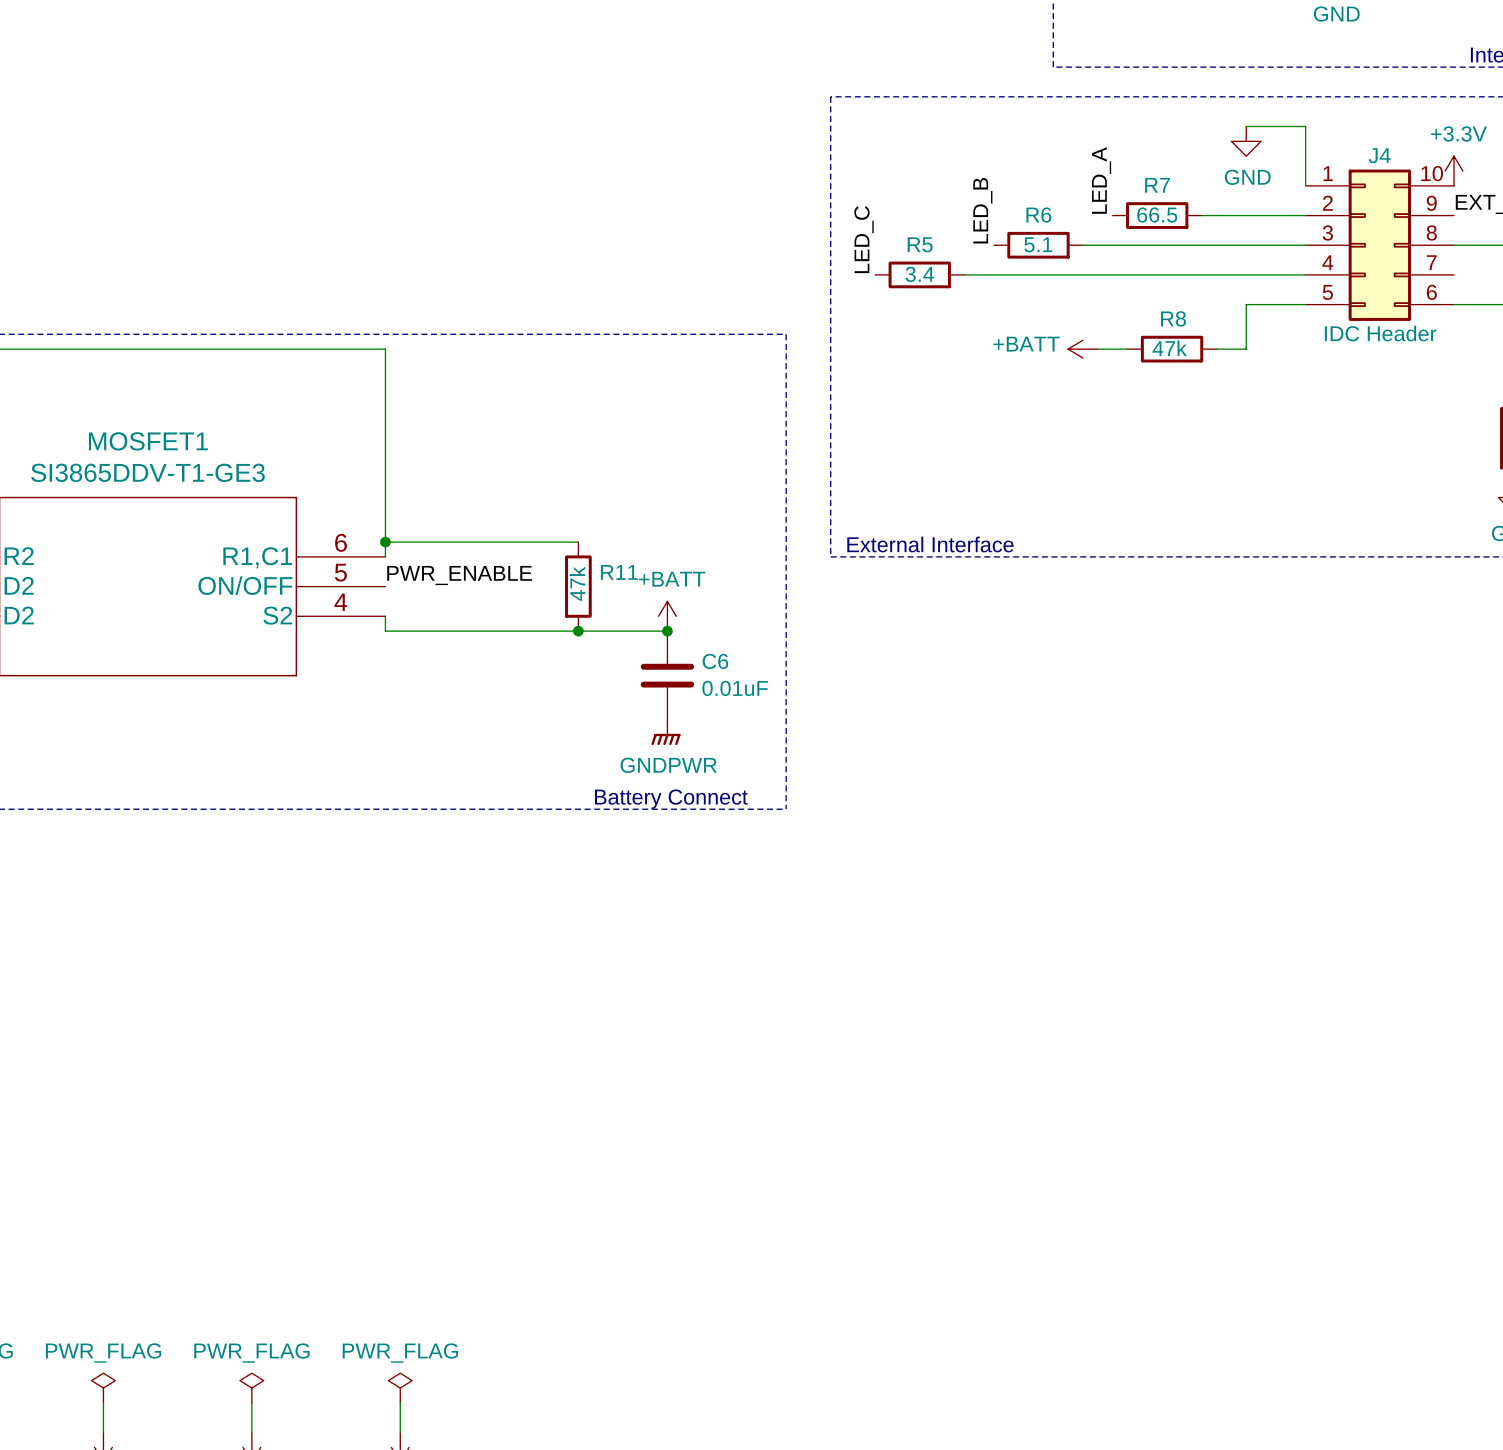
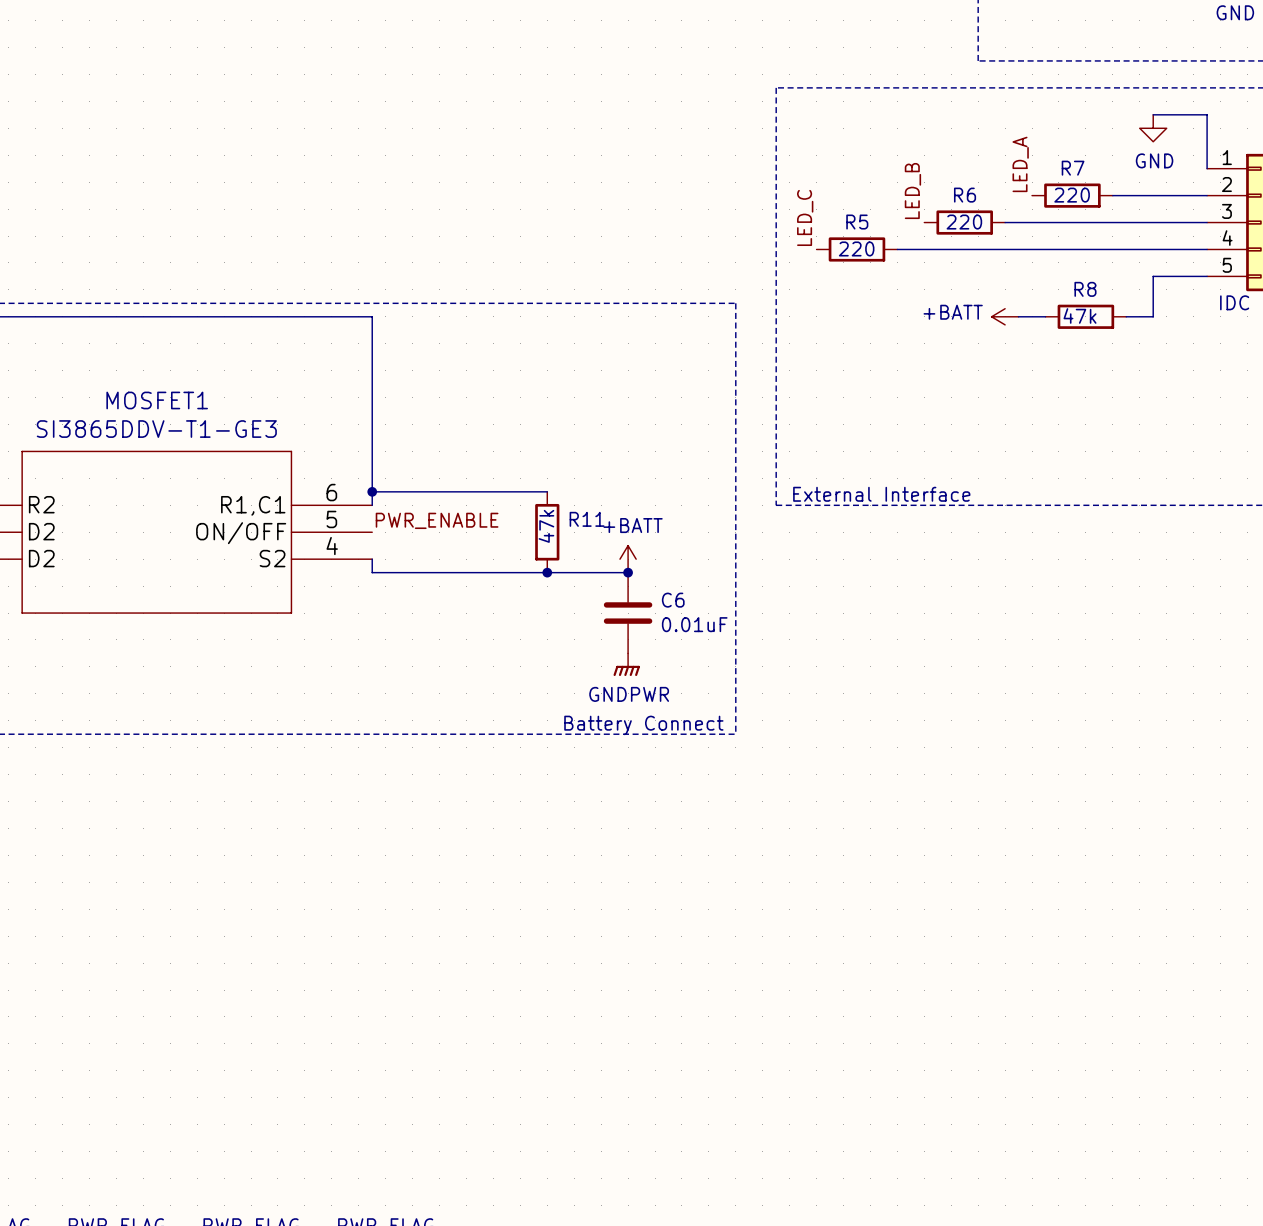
R7 value: 66.5 (1157, 215) -> 220 (1072, 195)
R6 value: 5.1 (1038, 244) -> 220 (964, 222)
R5 value: 3.4 (919, 274) -> 220 (856, 248)

